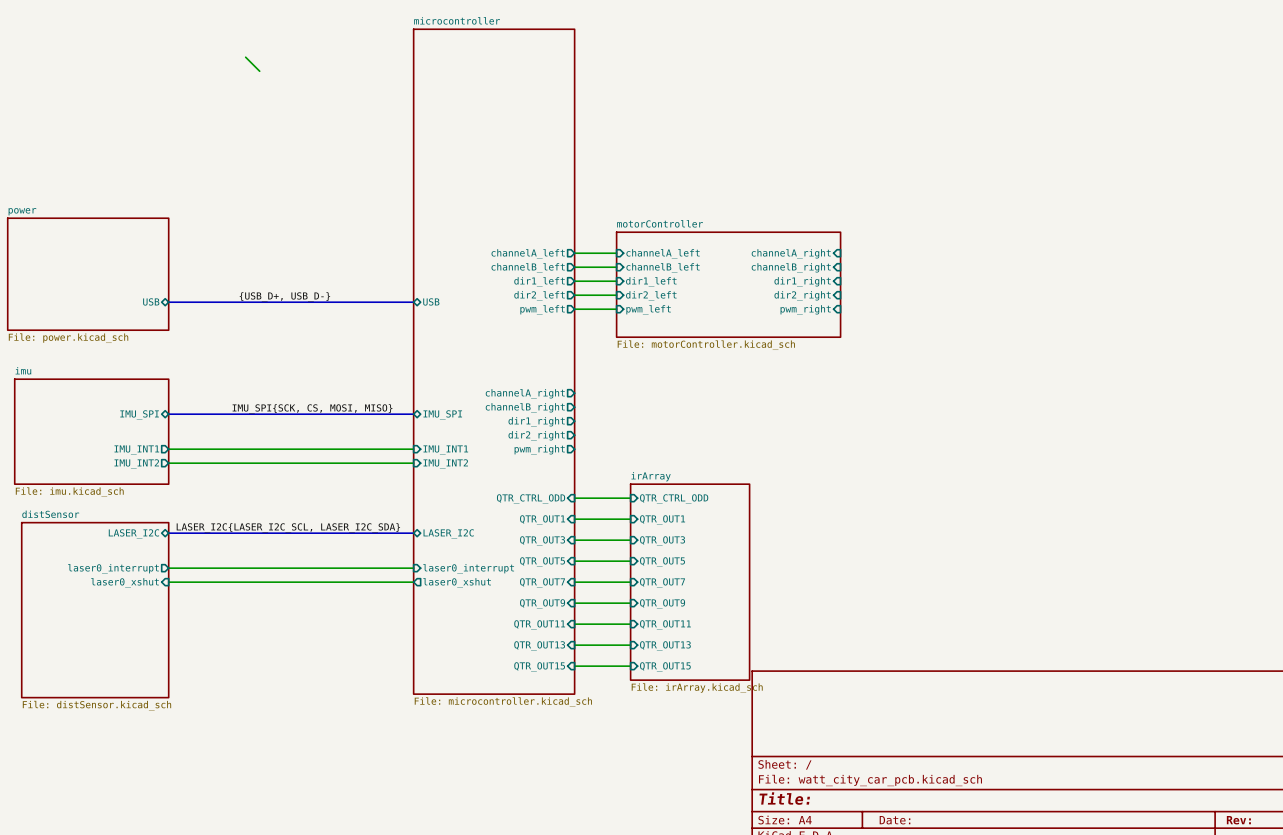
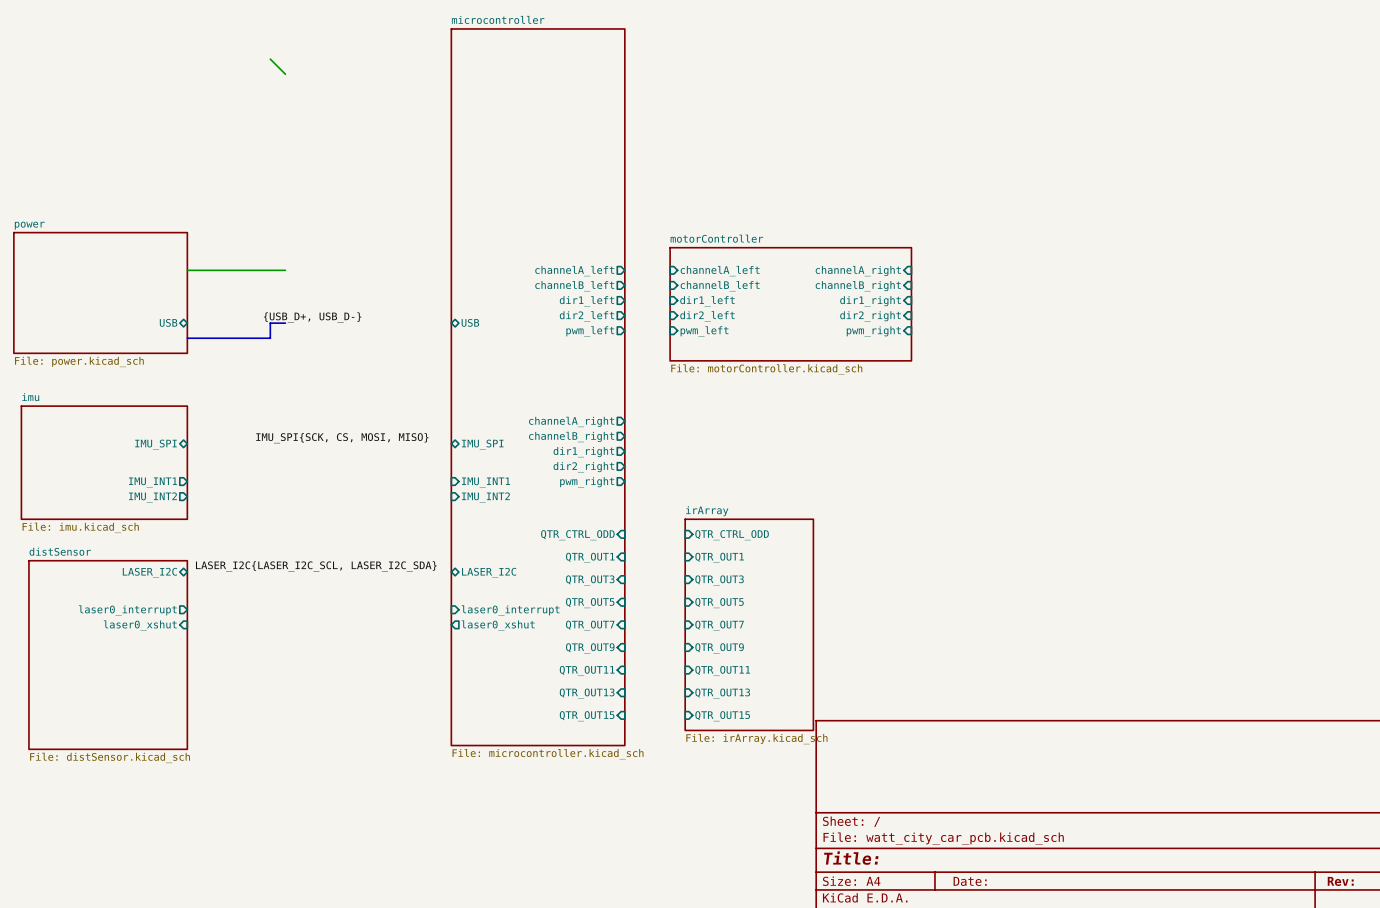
wire: none -> (187, 270) (285, 270)
wire: (574, 253) (616, 253) -> none
wire: (574, 267) (616, 267) -> none
wire: (574, 281) (616, 281) -> none
wire: (574, 295) (616, 295) -> none
bus: (168, 302) (245, 302) -> (187, 338) (270, 338) (270, 323)
bus: (259, 302) (413, 302) -> none
wire: (574, 309) (616, 309) -> none
bus: (168, 414) (413, 414) -> none
wire: (168, 449) (413, 449) -> none
wire: (168, 463) (413, 463) -> none
wire: (574, 498) (630, 498) -> none
wire: (574, 519) (630, 519) -> none
bus: (168, 533) (413, 533) -> none
wire: (574, 540) (630, 540) -> none
wire: (574, 561) (630, 561) -> none
wire: (168, 568) (413, 568) -> none
wire: (168, 582) (413, 582) -> none
wire: (574, 582) (630, 582) -> none
wire: (574, 603) (630, 603) -> none
wire: (574, 624) (630, 624) -> none
wire: (574, 645) (630, 645) -> none
wire: (574, 666) (630, 666) -> none

